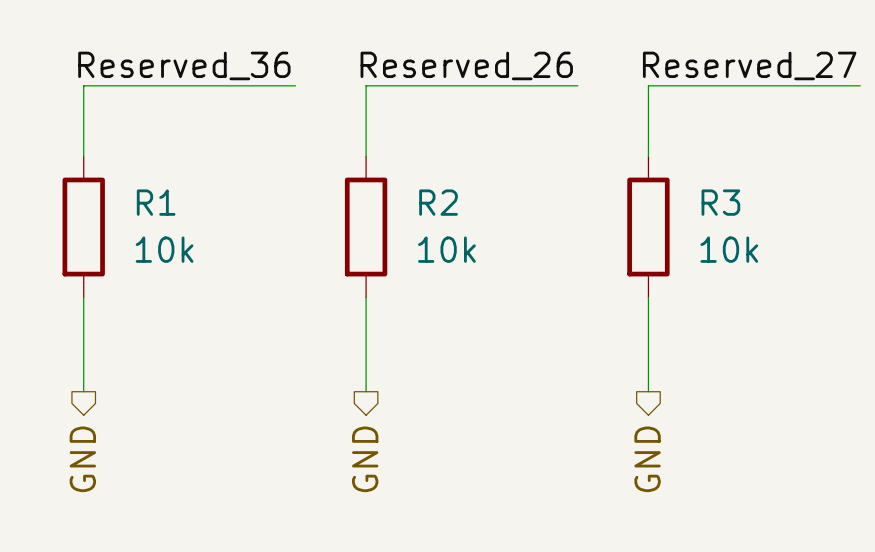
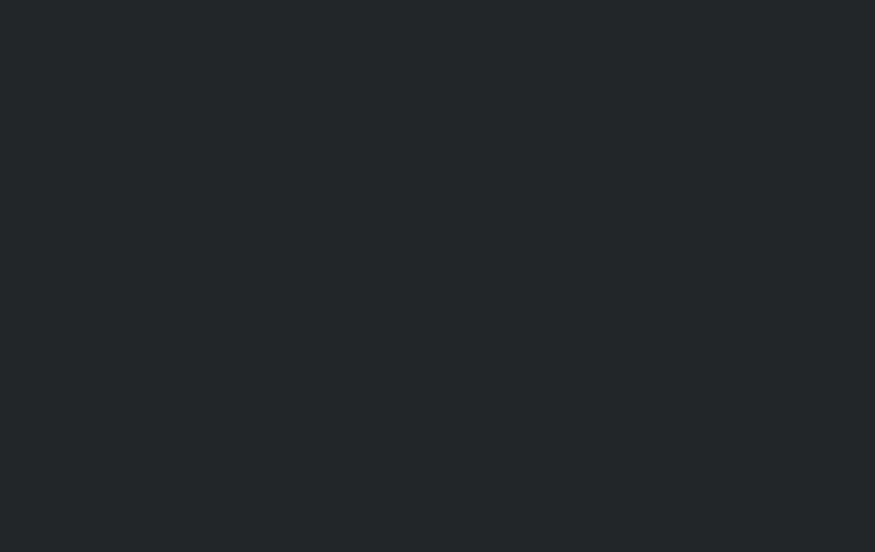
label: Reserved_36 (184, 65) -> none
label: Reserved_26 (466, 65) -> none
label: Reserved_27 (749, 65) -> none
wire: (295, 85) (83, 85) (83, 156) -> none
wire: (577, 85) (366, 85) (366, 156) -> none
wire: (860, 85) (648, 85) (648, 156) -> none
R1: 10k (83, 227) -> none
R2: 10k (366, 227) -> none
R3: 10k (648, 227) -> none
wire: (83, 297) (83, 391) -> none
wire: (366, 297) (366, 391) -> none
wire: (648, 297) (648, 391) -> none
hierarchical label: GND (82, 459) -> none
hierarchical label: GND (365, 459) -> none
hierarchical label: GND (647, 459) -> none

